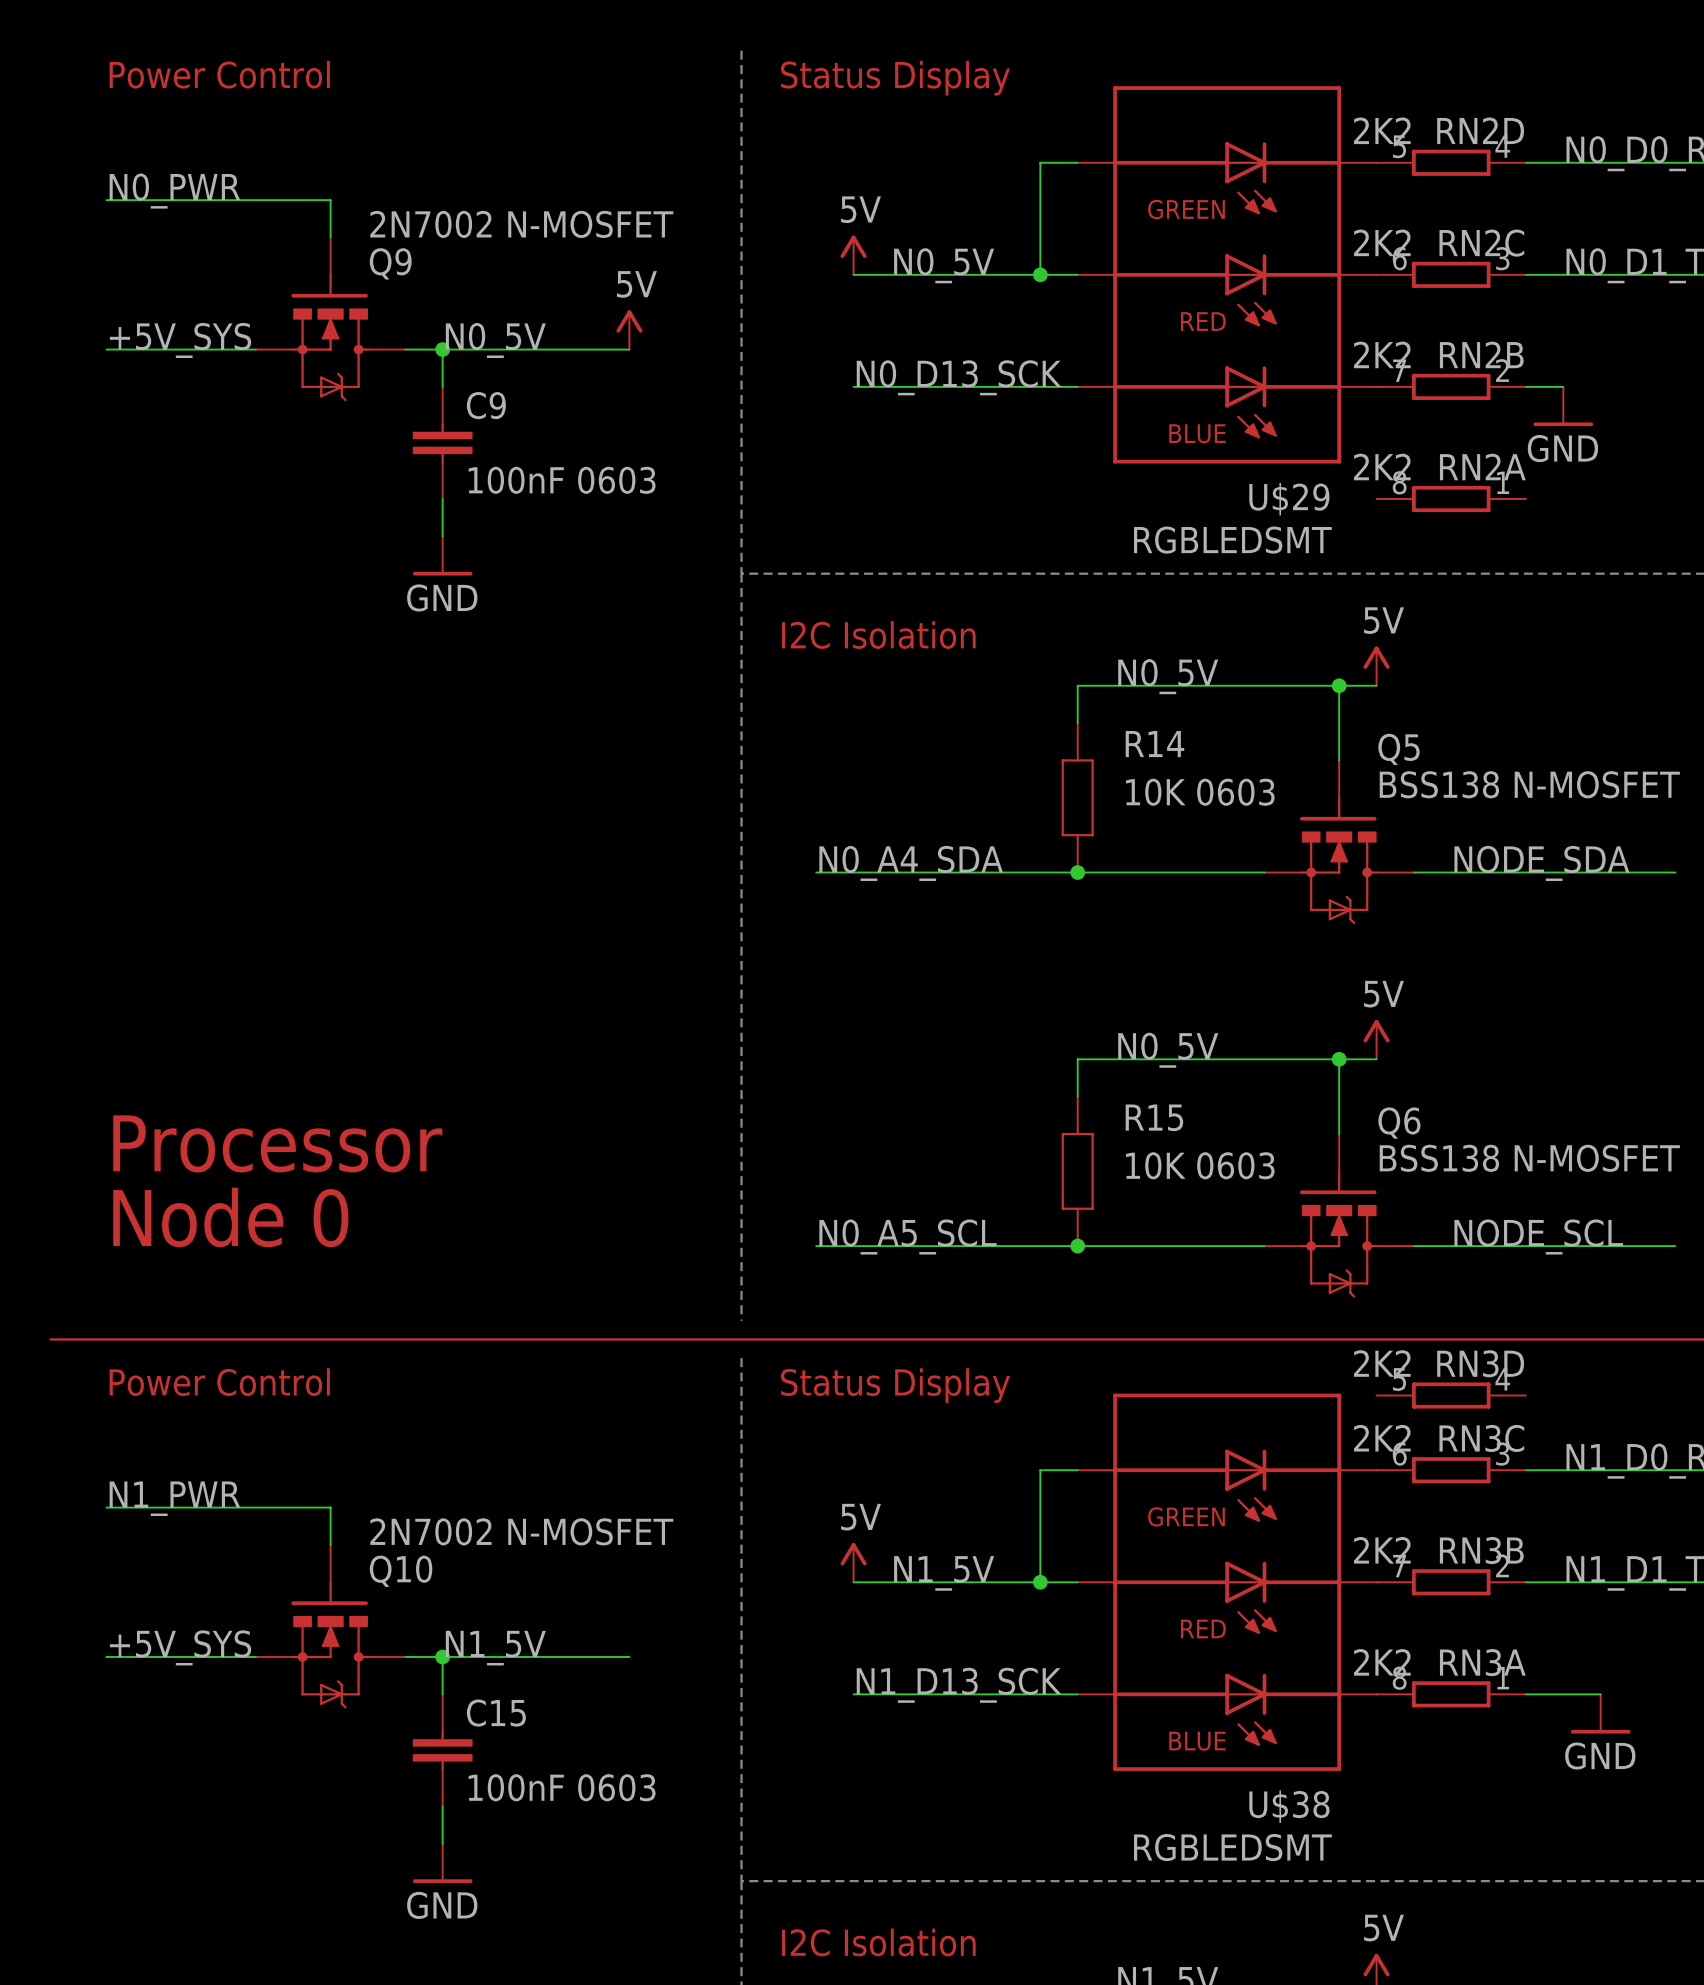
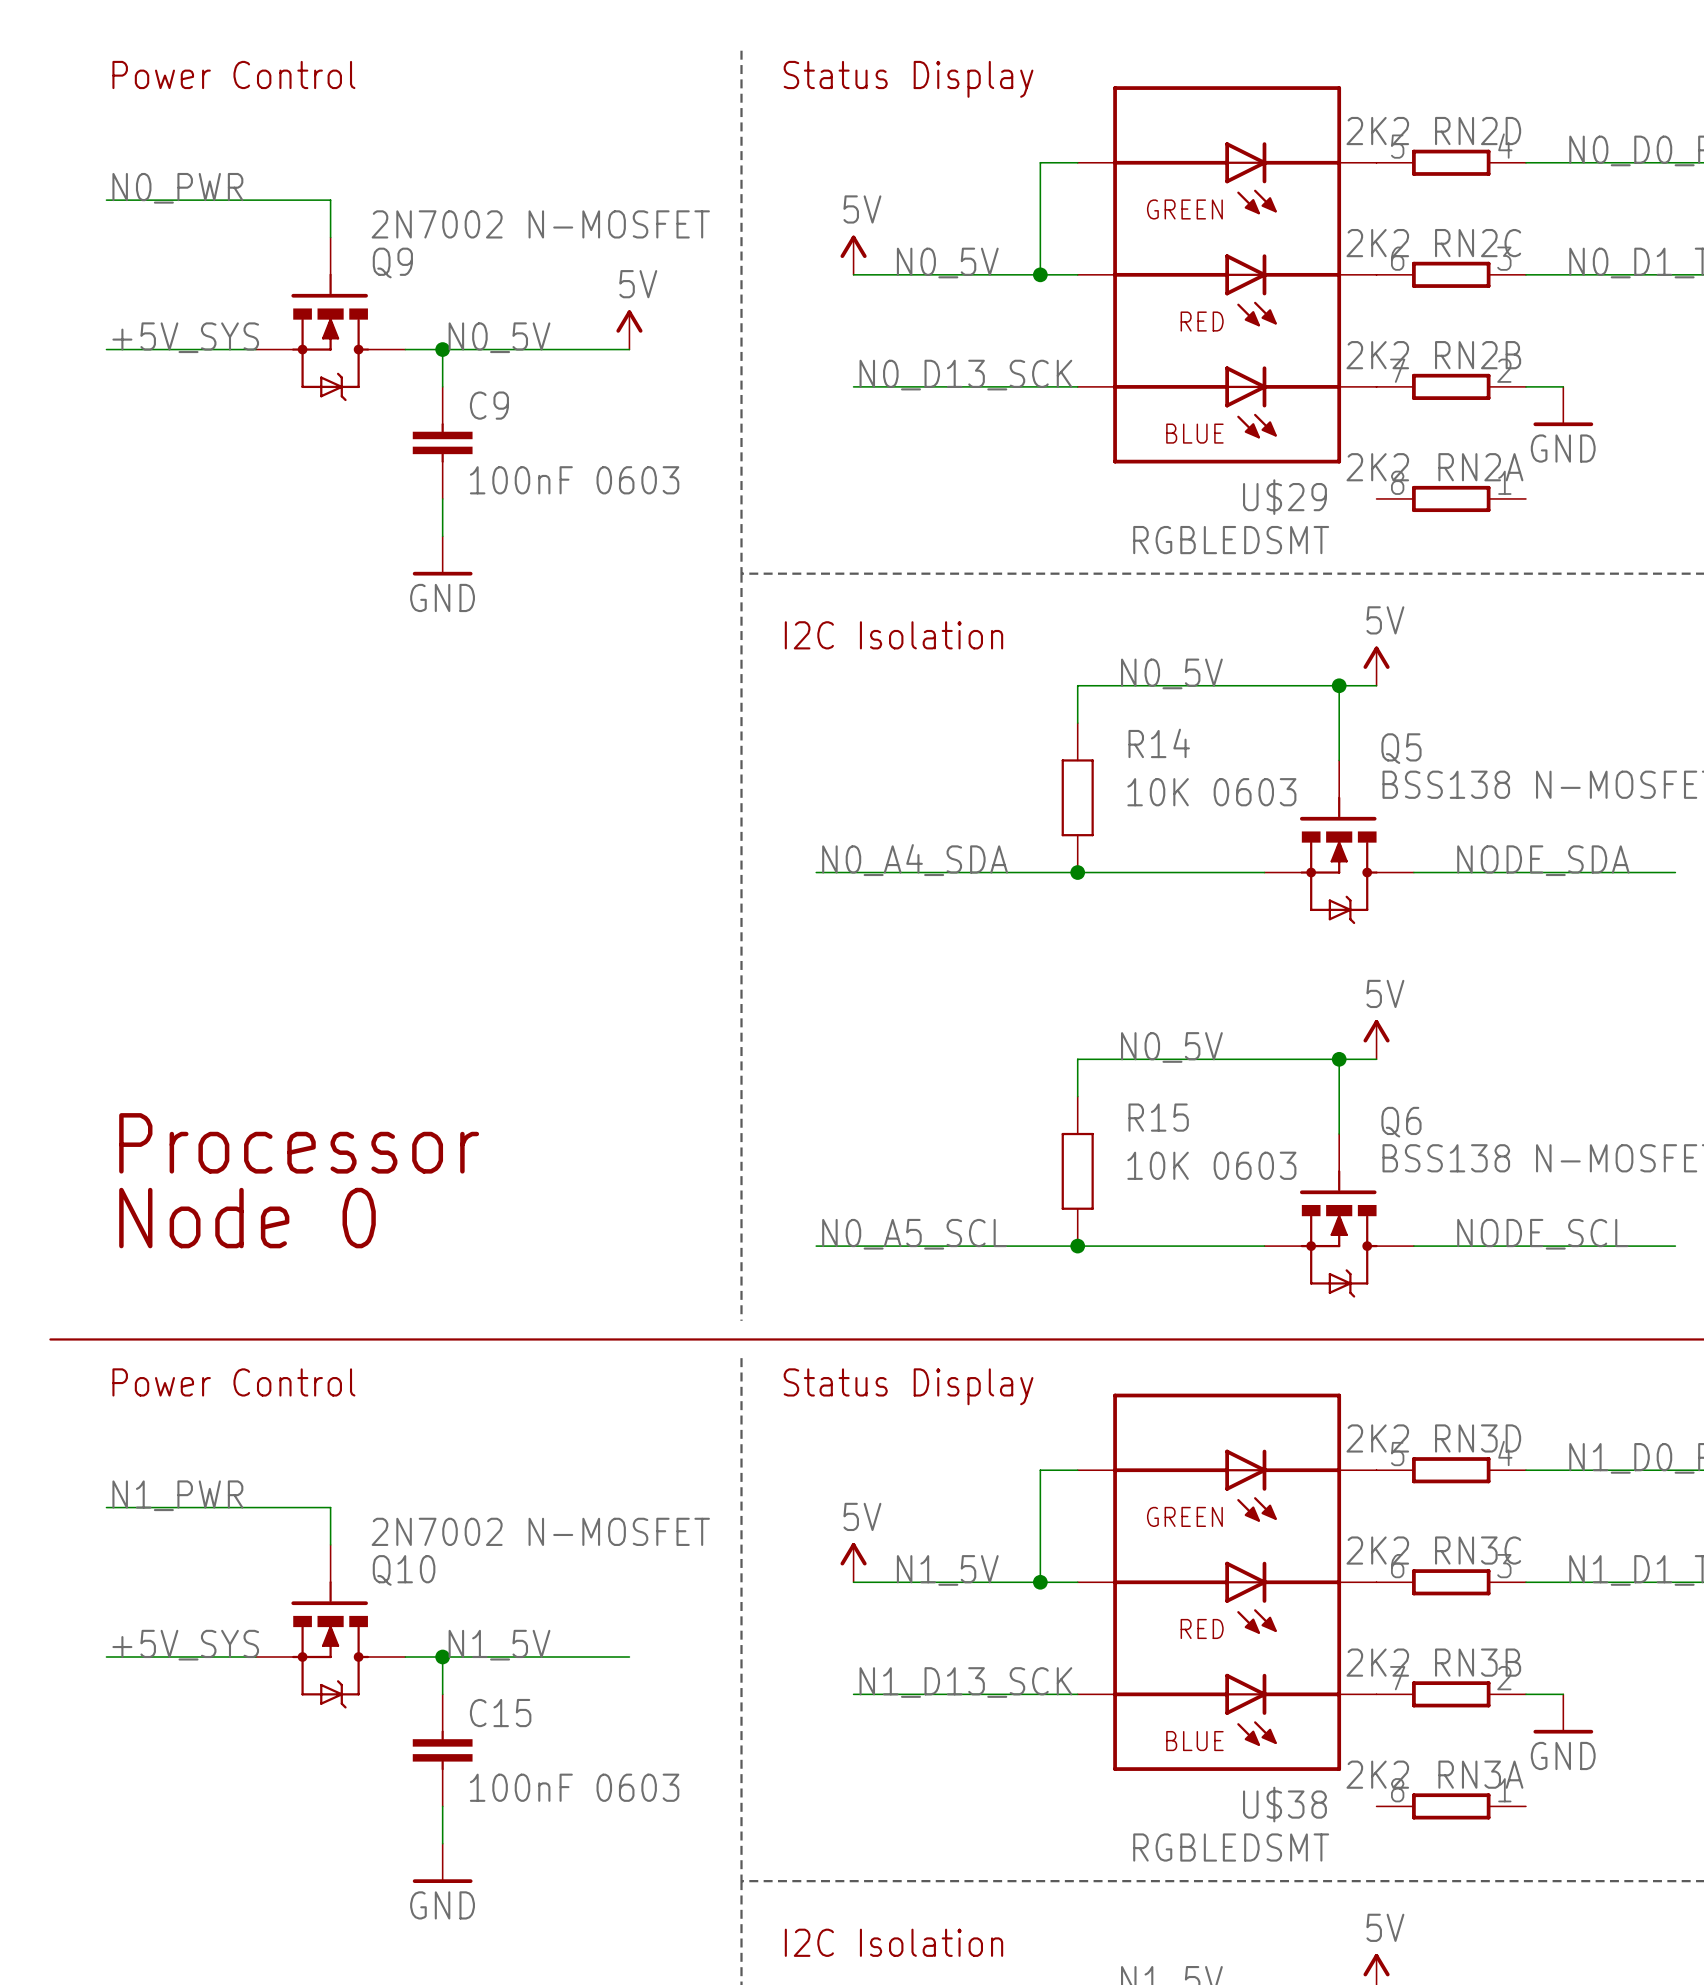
RN3D position: (1451, 1395) -> (1451, 1470)
RN3C position: (1451, 1470) -> (1451, 1582)
RN3B position: (1451, 1582) -> (1451, 1694)
RN3A position: (1451, 1694) -> (1451, 1806)
wire: (1563, 1694) (1600, 1694) -> none
power symbol position: GND (1600, 1713) -> GND (1563, 1713)

